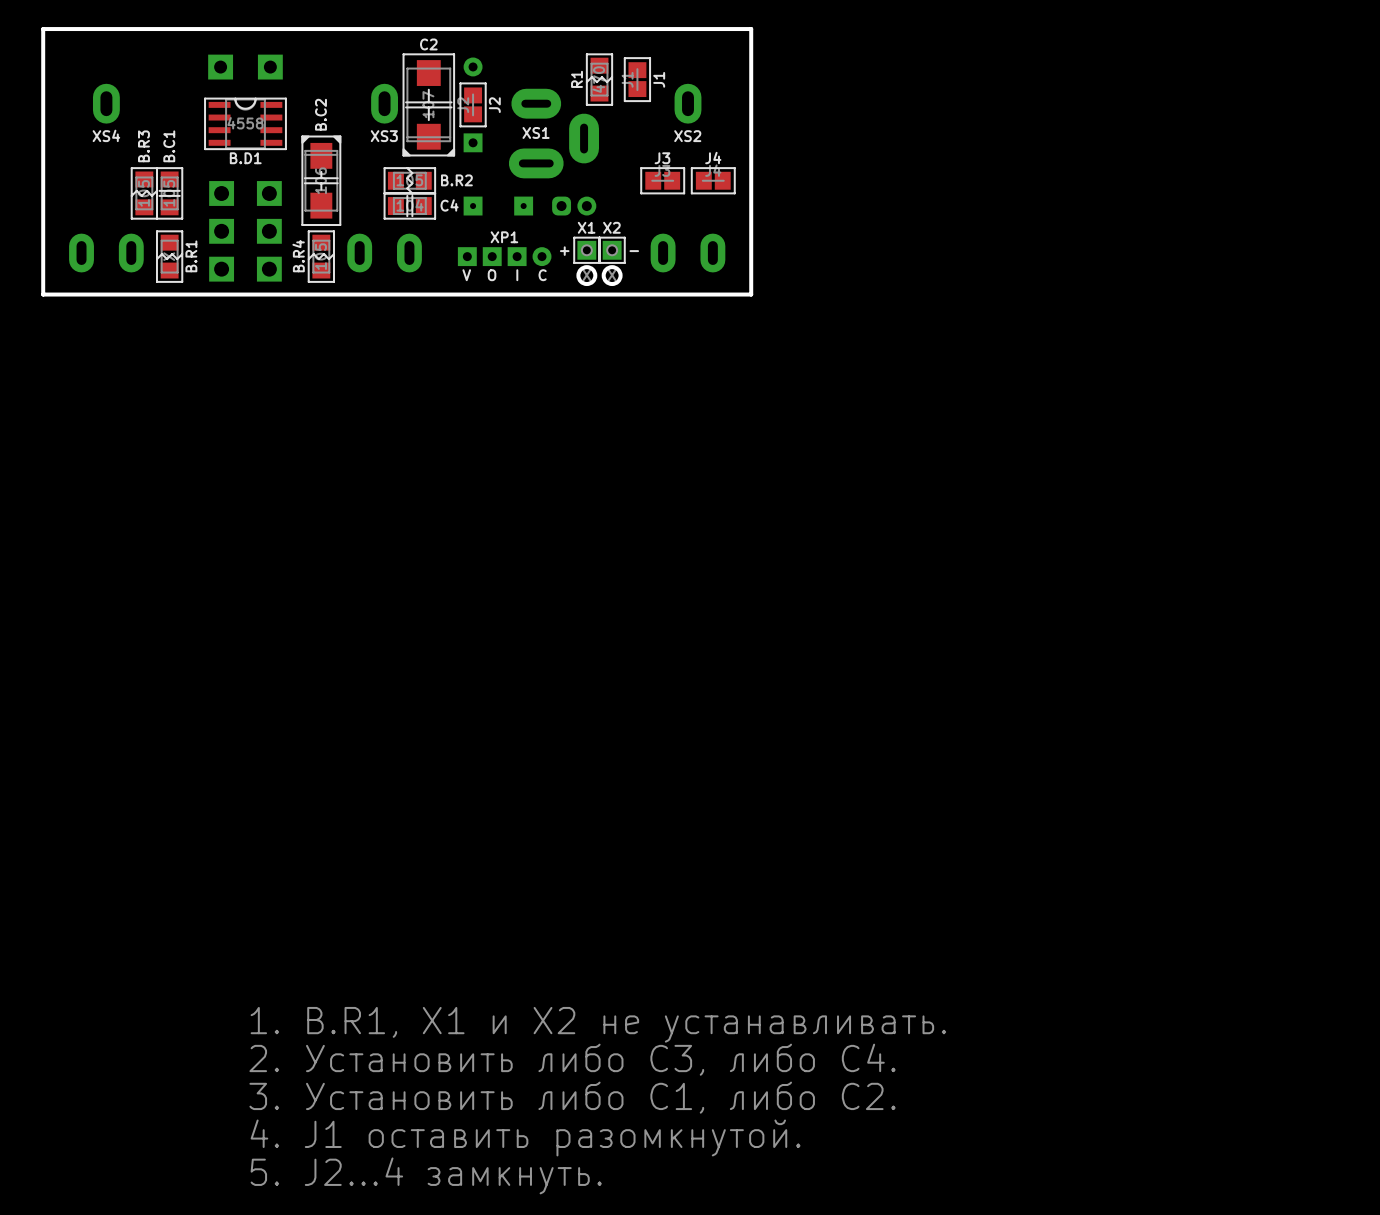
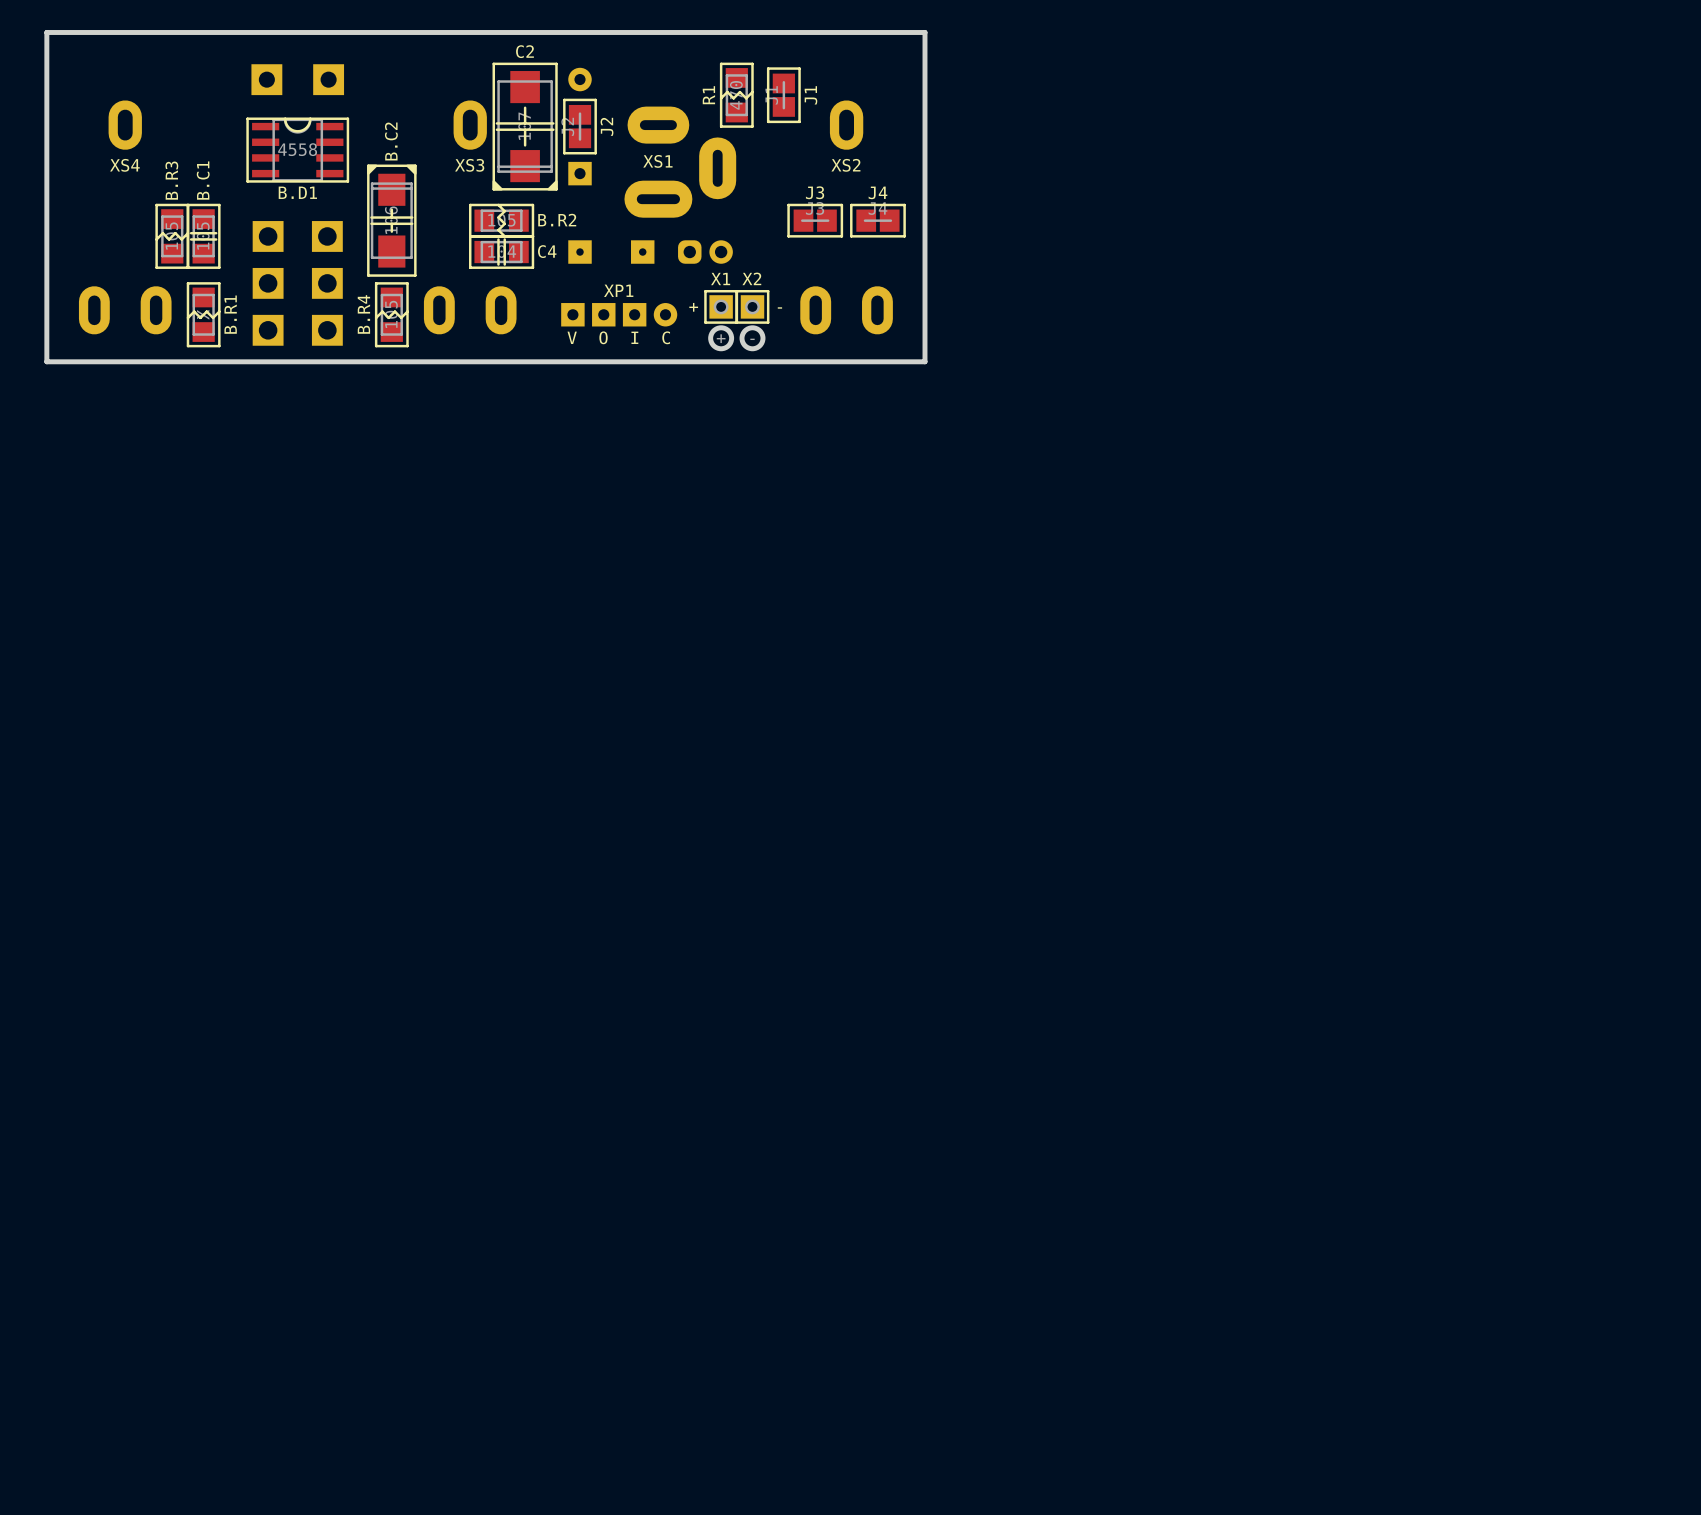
X1 value: X (586, 275) -> + (721, 338)
X2 value: X (612, 275) -> - (752, 339)
text: 1. B.R1, X1 и X2 не устанавливать. (598, 1024) -> none
text: 2. Установить либо C3, либо C4. (572, 1059) -> none
text: 3. Установить либо C1, либо C2. (572, 1097) -> none
text: 4. J1 оставить разомкнутой. (525, 1137) -> none
text: 5. J2...4 замкнуть. (426, 1175) -> none

